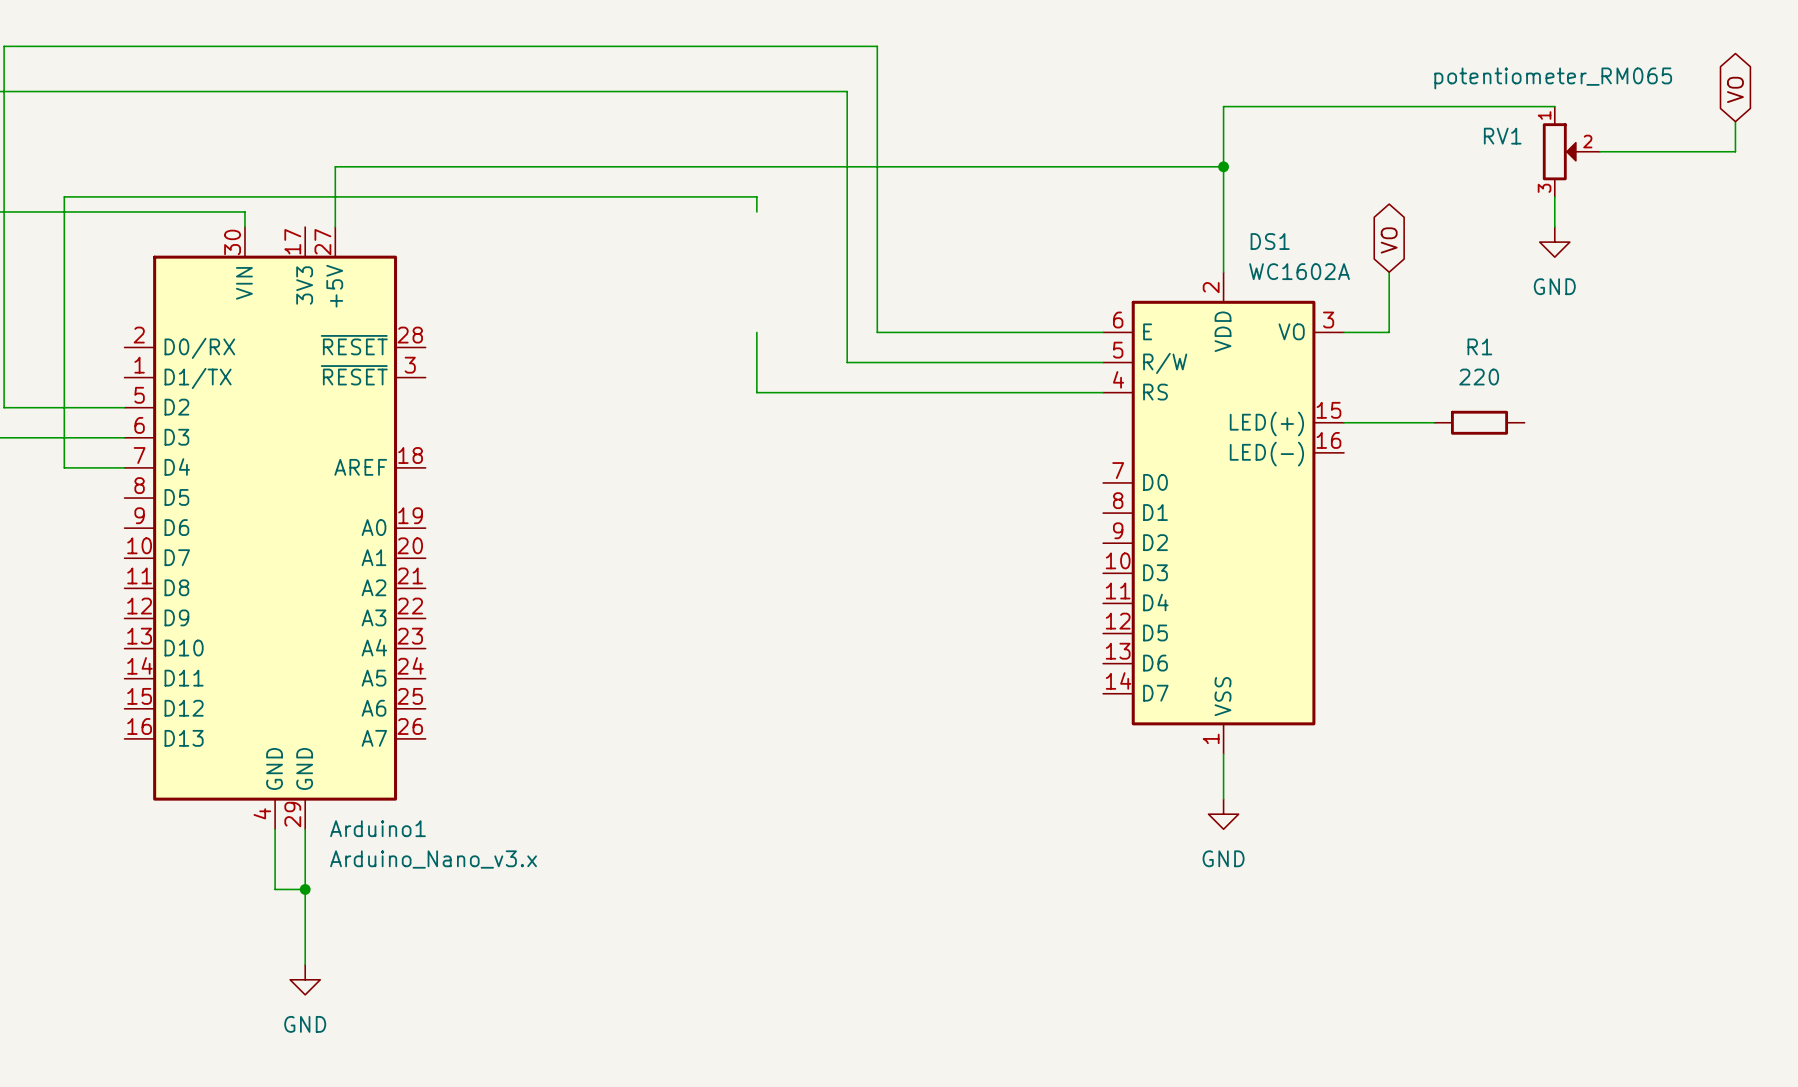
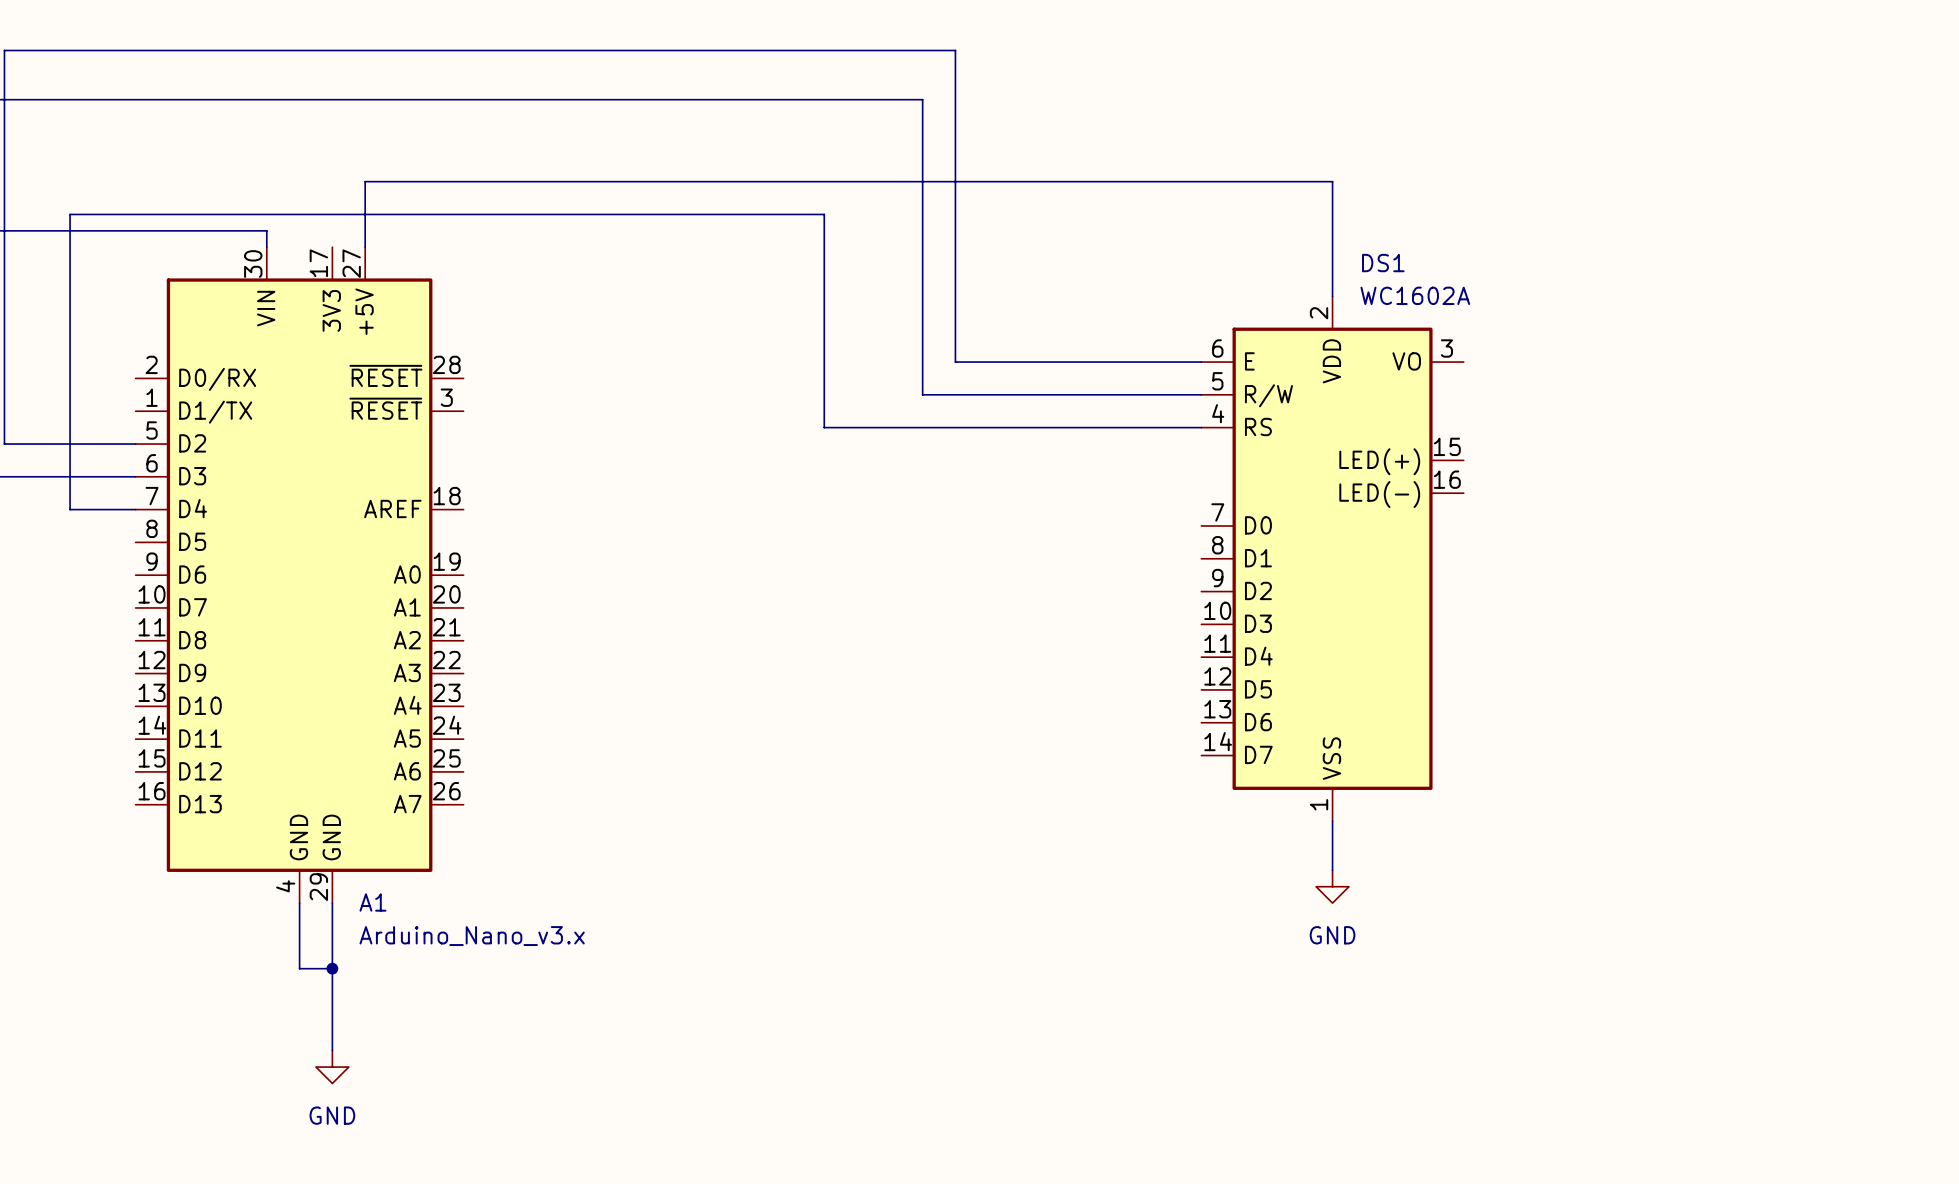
global label: VO (1735, 89) -> none
wire: (1554, 106) (1223, 106) (1223, 166) -> none
wire: (1735, 121) (1735, 151) (1599, 151) -> none
RV1: potentiometer_RM065 (1571, 151) -> none
junction: (1223, 166) -> none
wire: (1554, 196) (1554, 227) -> none
wire: none -> (824, 230) (824, 362)
global label: VO (1389, 240) -> none
power symbol: GND (1554, 242) -> none
wire: (1389, 272) (1389, 332) (1344, 332) -> none
wire: (1344, 422) (1434, 422) -> none
R1: 220 (1479, 422) -> none
Arduino1 name: Arduino1 (377, 828) -> A1 (372, 902)

